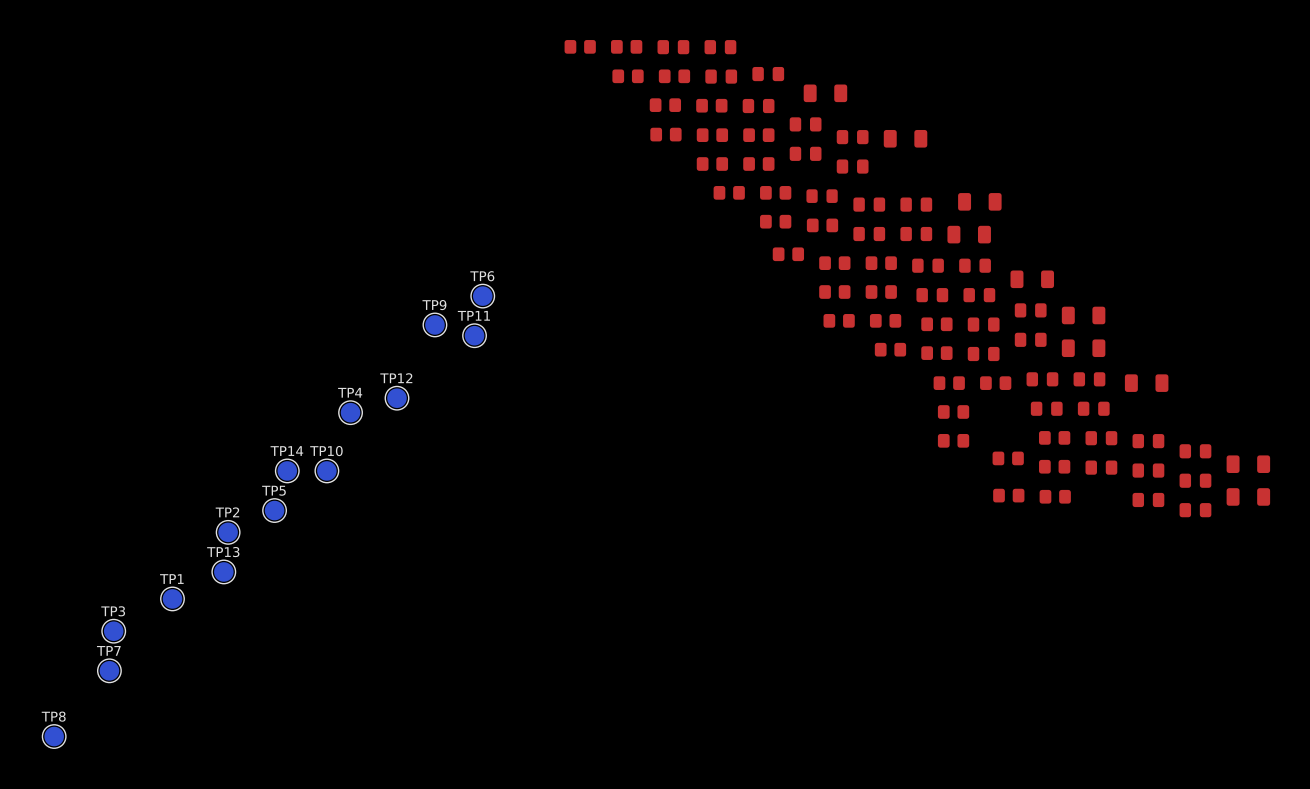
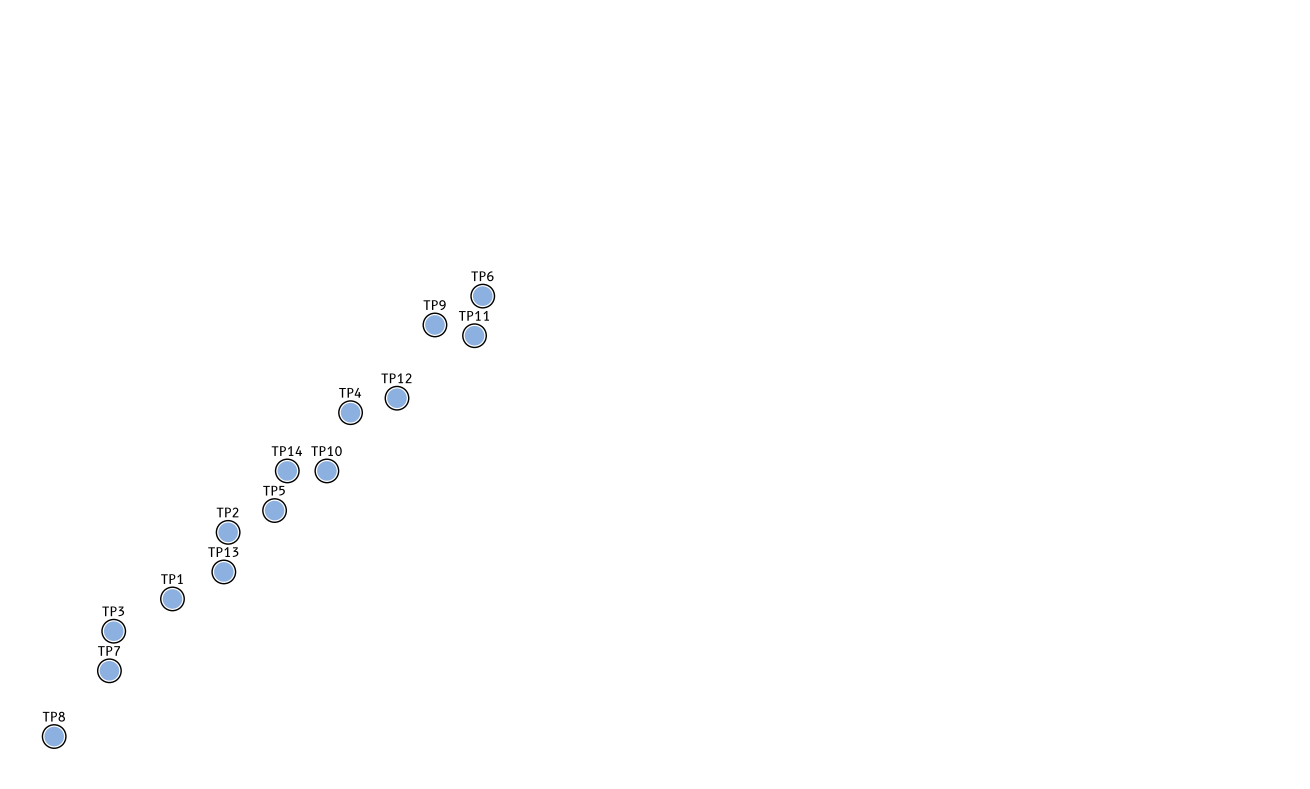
part: (580, 46) -> none
part: (626, 46) -> none
part: (673, 47) -> none
part: (720, 47) -> none
part: (768, 74) -> none
part: (628, 76) -> none
part: (674, 76) -> none
part: (721, 76) -> none
part: (825, 93) -> none
part: (665, 105) -> none
part: (711, 105) -> none
part: (758, 106) -> none
part: (805, 124) -> none
part: (665, 134) -> none
part: (712, 135) -> none
part: (758, 135) -> none
part: (852, 137) -> none
part: (905, 138) -> none
part: (805, 153) -> none
part: (712, 164) -> none
part: (758, 164) -> none
part: (852, 166) -> none
part: (729, 192) -> none
part: (775, 192) -> none
part: (822, 196) -> none
part: (979, 201) -> none
part: (869, 204) -> none
part: (916, 204) -> none
part: (775, 221) -> none
part: (822, 225) -> none
part: (869, 234) -> none
part: (916, 234) -> none
part: (969, 234) -> none
part: (788, 254) -> none
part: (834, 263) -> none
part: (881, 263) -> none
part: (928, 265) -> none
part: (975, 265) -> none
part: (1032, 279) -> none
part: (834, 292) -> none
part: (881, 292) -> none
part: (932, 295) -> none
part: (979, 295) -> none
part: (1030, 310) -> none
part: (1083, 315) -> none
part: (839, 320) -> none
part: (885, 320) -> none
part: (936, 324) -> none
part: (983, 324) -> none
part: (1030, 339) -> none
part: (1083, 348) -> none
part: (890, 349) -> none
part: (936, 353) -> none
part: (983, 354) -> none
part: (1042, 379) -> none
part: (1089, 379) -> none
part: (949, 383) -> none
part: (995, 383) -> none
part: (1146, 383) -> none
part: (1046, 408) -> none
part: (1093, 408) -> none
part: (953, 411) -> none
part: (1054, 437) -> none
part: (1101, 438) -> none
part: (953, 440) -> none
part: (1148, 441) -> none
part: (1195, 451) -> none
part: (1008, 458) -> none
part: (1248, 464) -> none
part: (1054, 466) -> none
part: (1101, 467) -> none
part: (1148, 470) -> none
part: (1195, 480) -> none
part: (1008, 495) -> none
part: (1055, 496) -> none
part: (1248, 496) -> none
part: (1148, 499) -> none
part: (1195, 510) -> none

